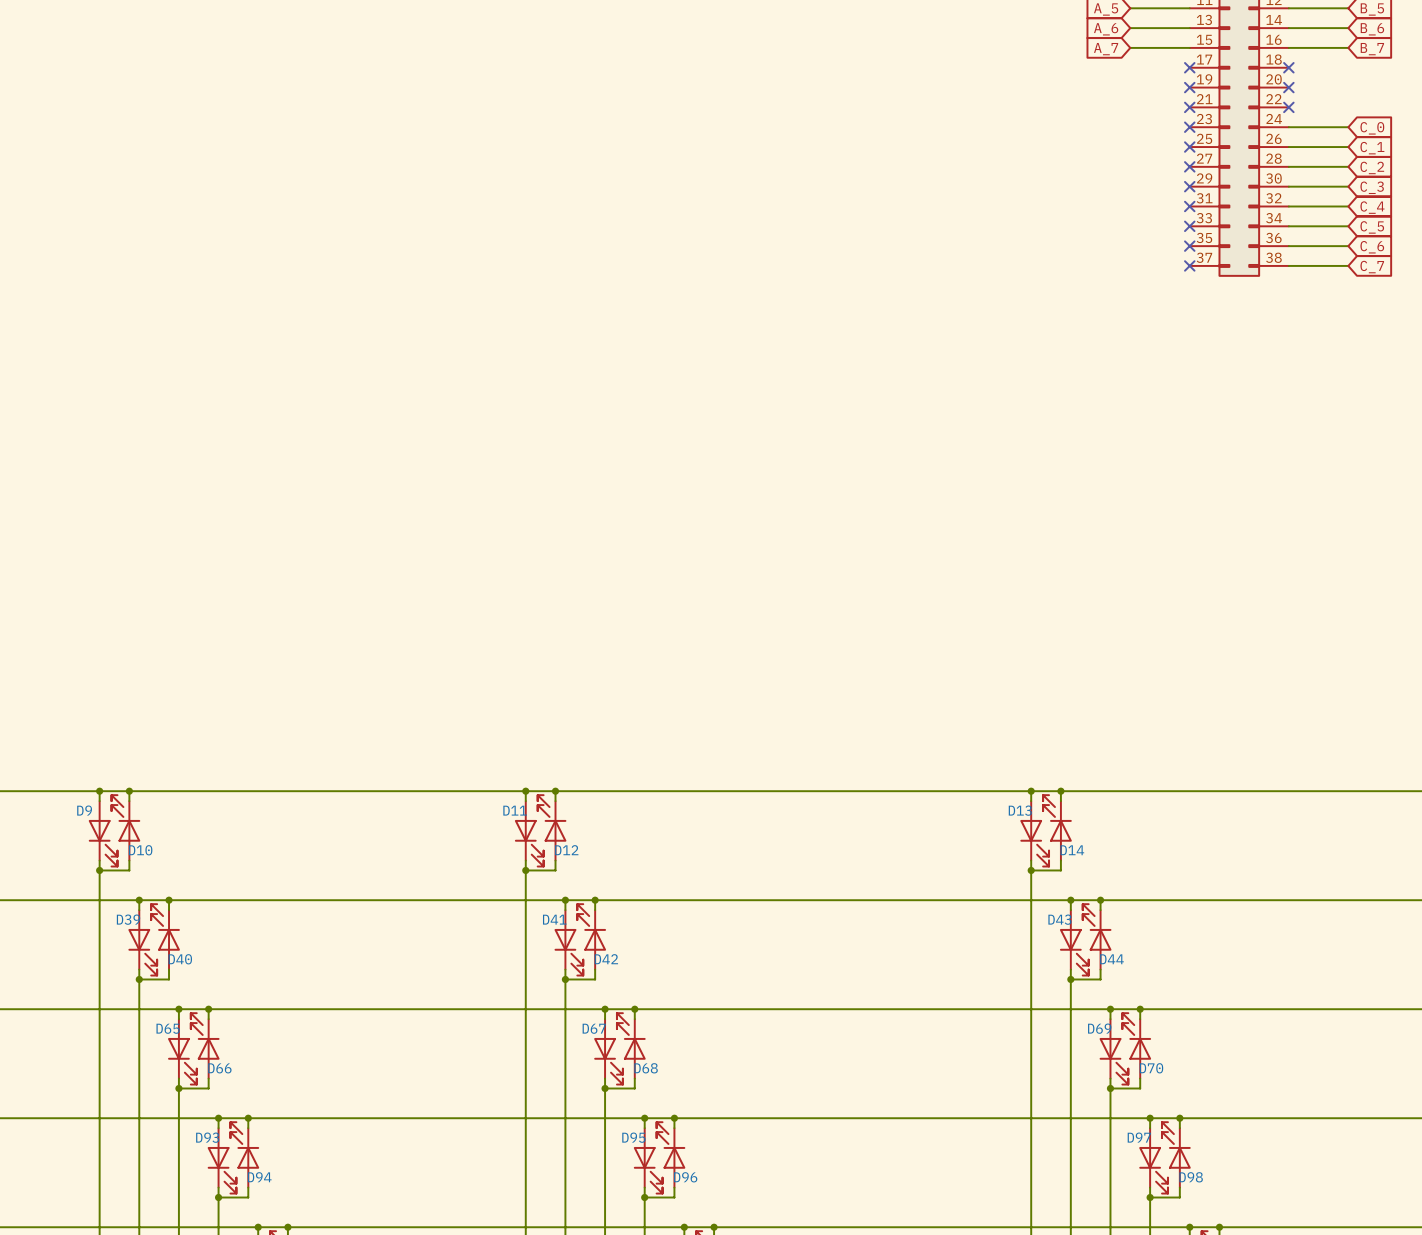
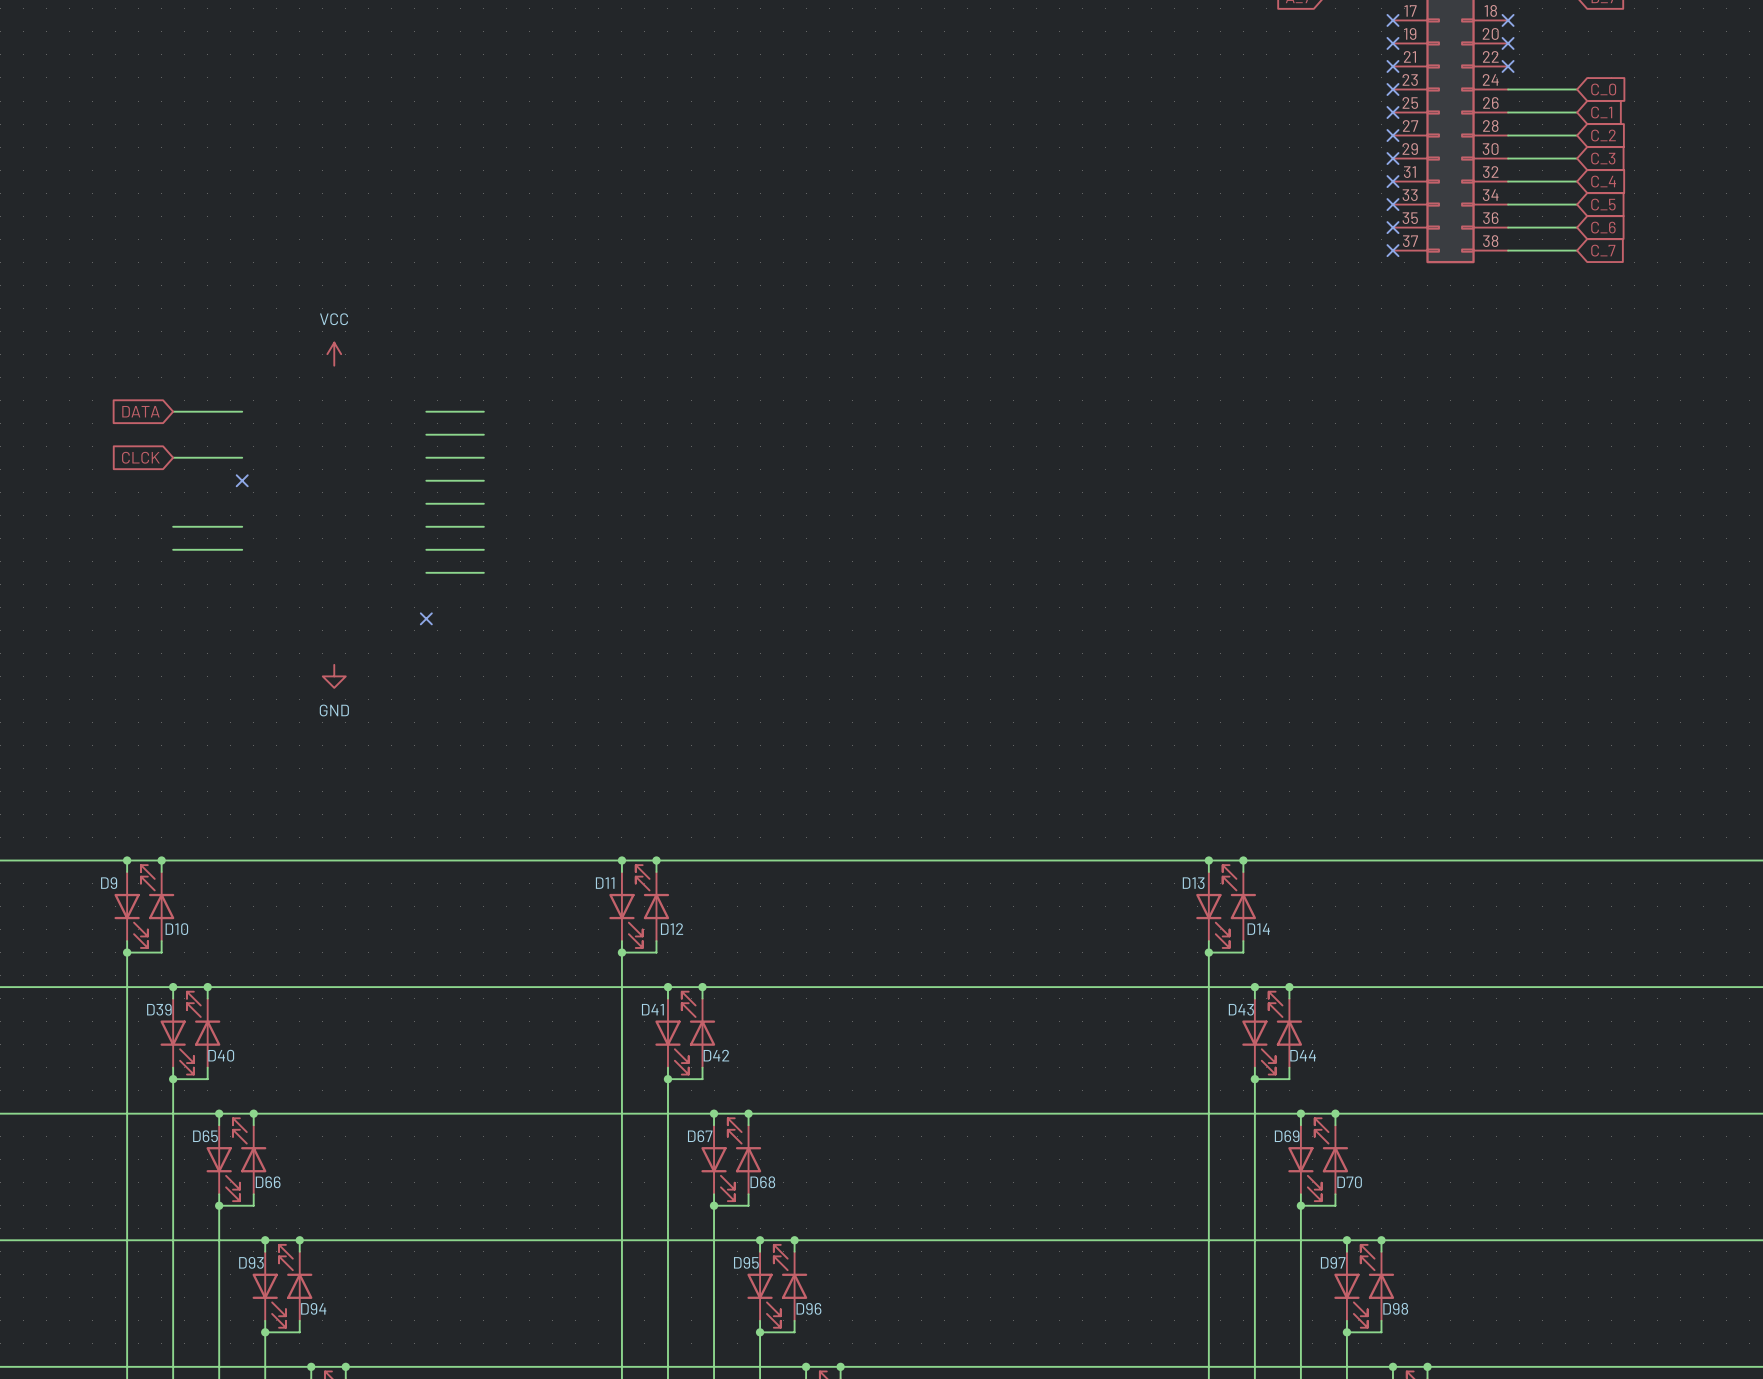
power symbol: none -> VCC (334, 354)
global label: none -> DATA (140, 411)
wire: none -> (173, 411) (242, 411)
wire: none -> (426, 411) (483, 411)
wire: none -> (426, 434) (483, 434)
global label: none -> CLCK (140, 457)
wire: none -> (173, 457) (242, 457)
wire: none -> (426, 457) (483, 457)
no-connect mark: none -> (242, 480)
wire: none -> (426, 480) (483, 480)
wire: none -> (426, 503) (483, 503)
wire: none -> (173, 526) (242, 526)
wire: none -> (426, 526) (483, 526)
wire: none -> (173, 549) (242, 549)
wire: none -> (426, 549) (483, 549)
wire: none -> (426, 572) (483, 572)
no-connect mark: none -> (426, 618)
power symbol: none -> GND (334, 676)

